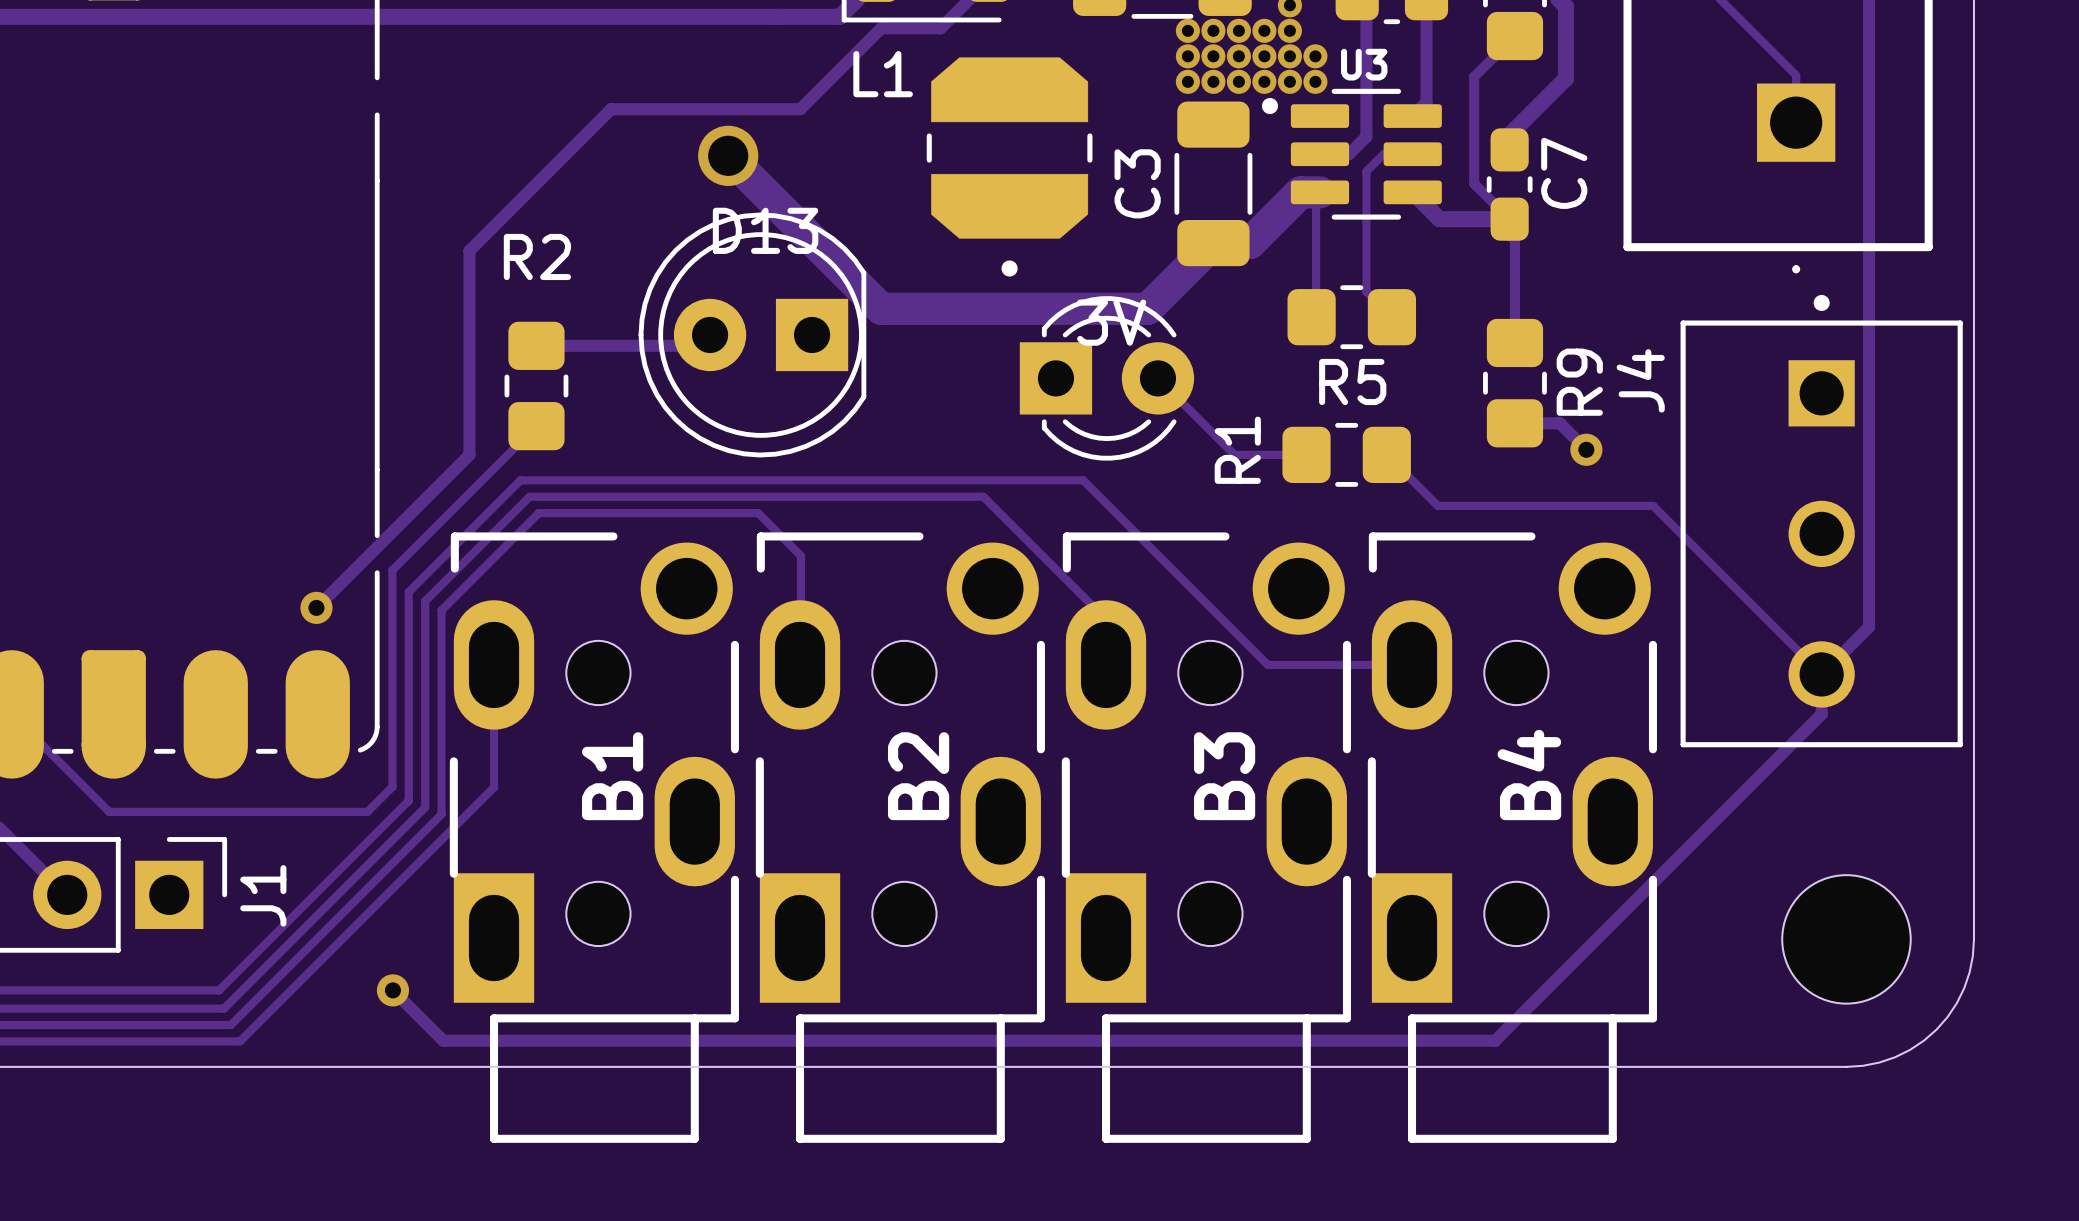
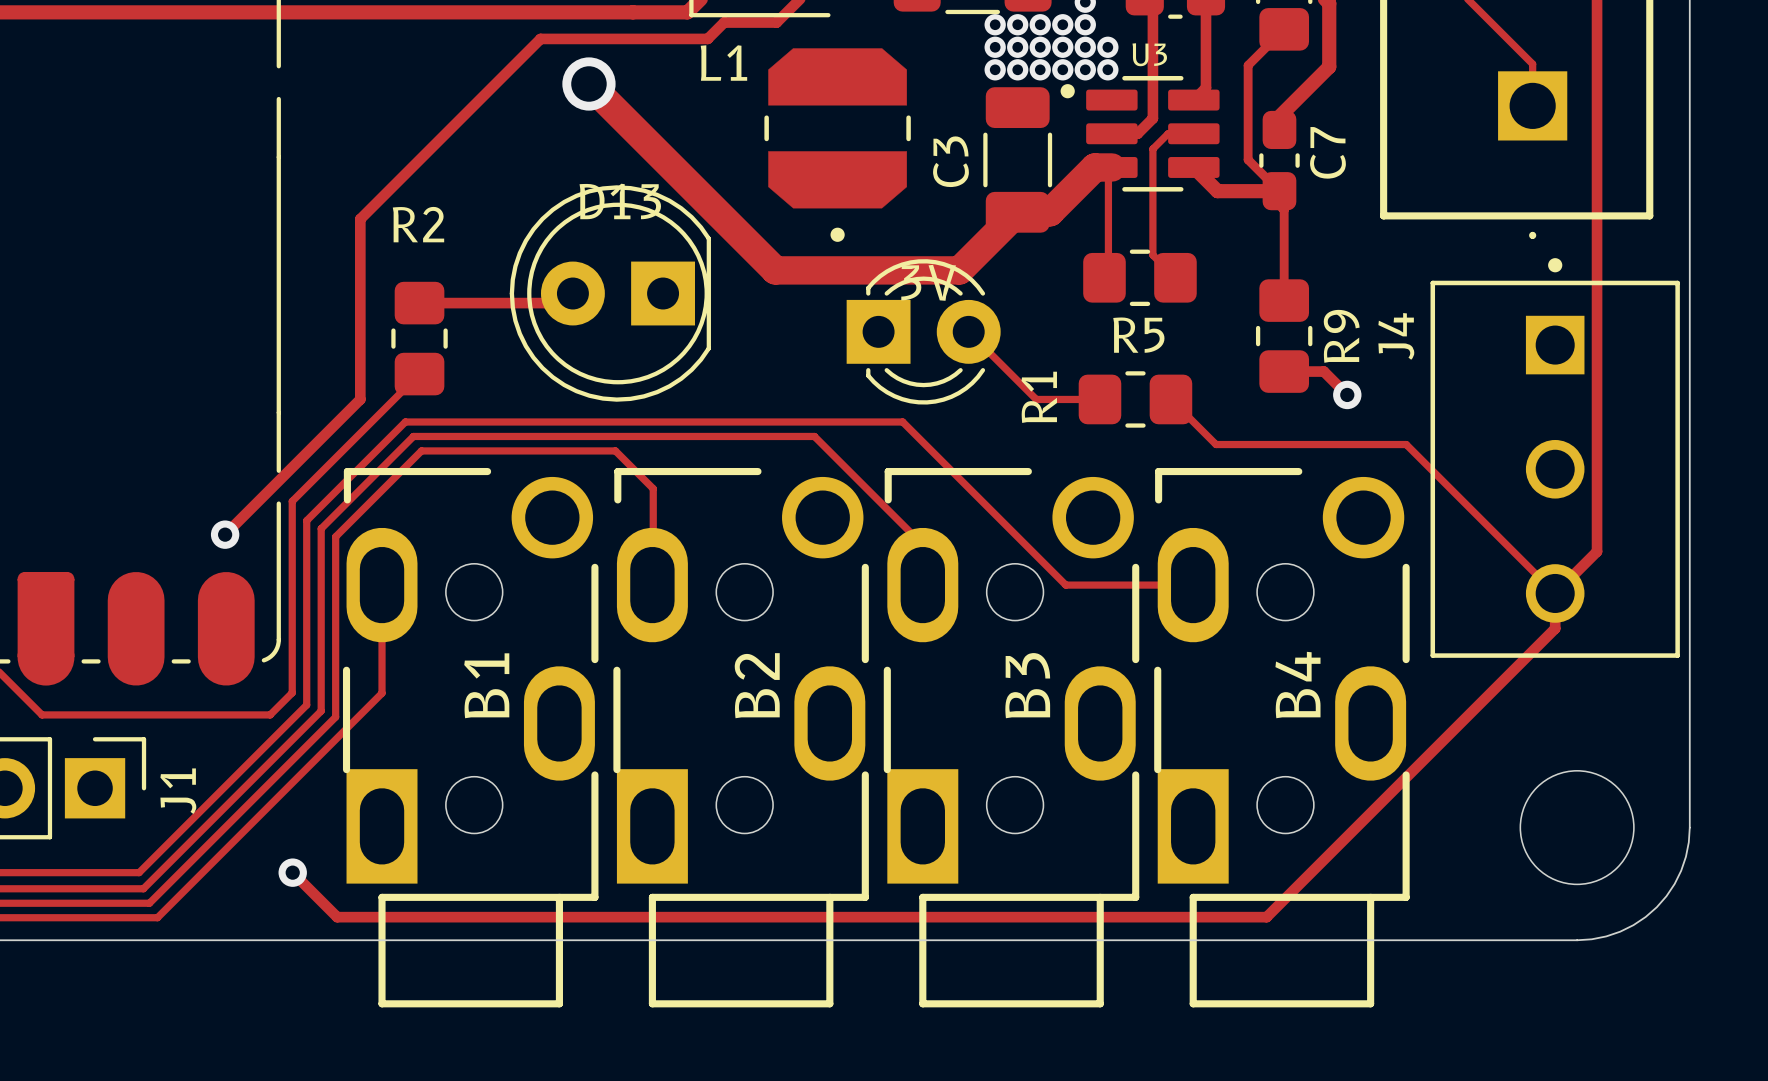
track: (862, 46) (800, 109) (611, 109) -> (707, 38) (540, 38) (485, 93)
track: (728, 155) (881, 308) (939, 308) -> (588, 83) (775, 270)
via position: (728, 155) -> (588, 83)

